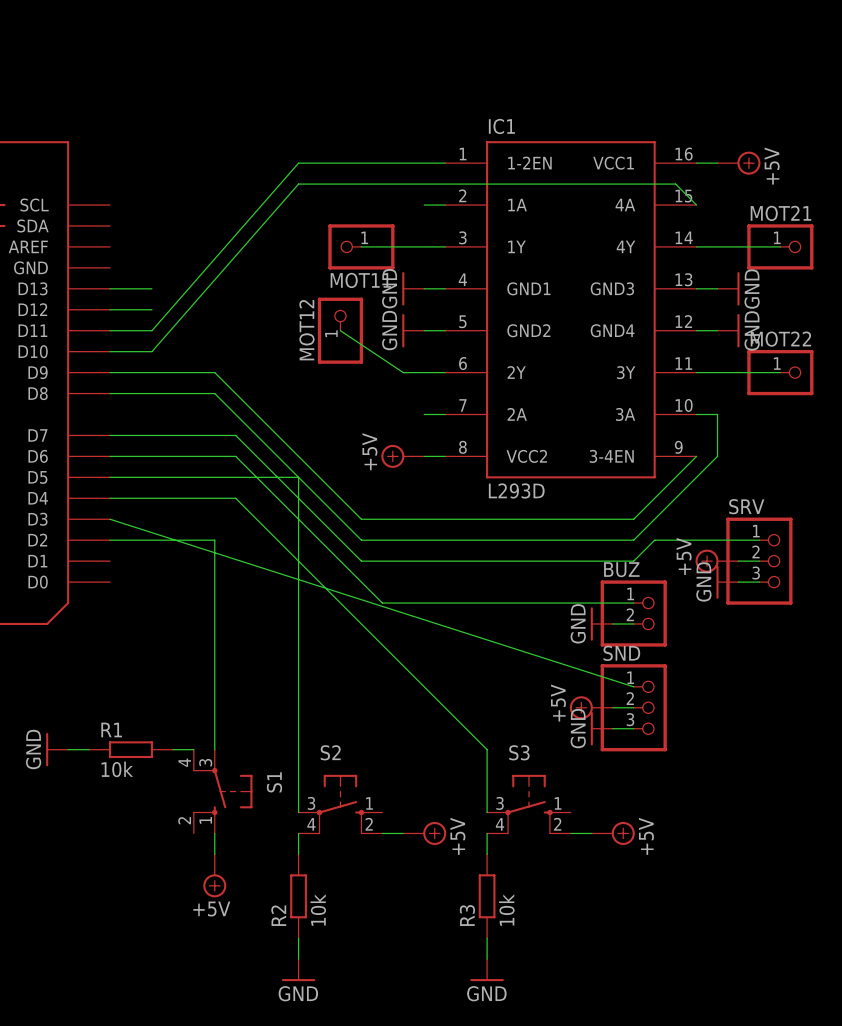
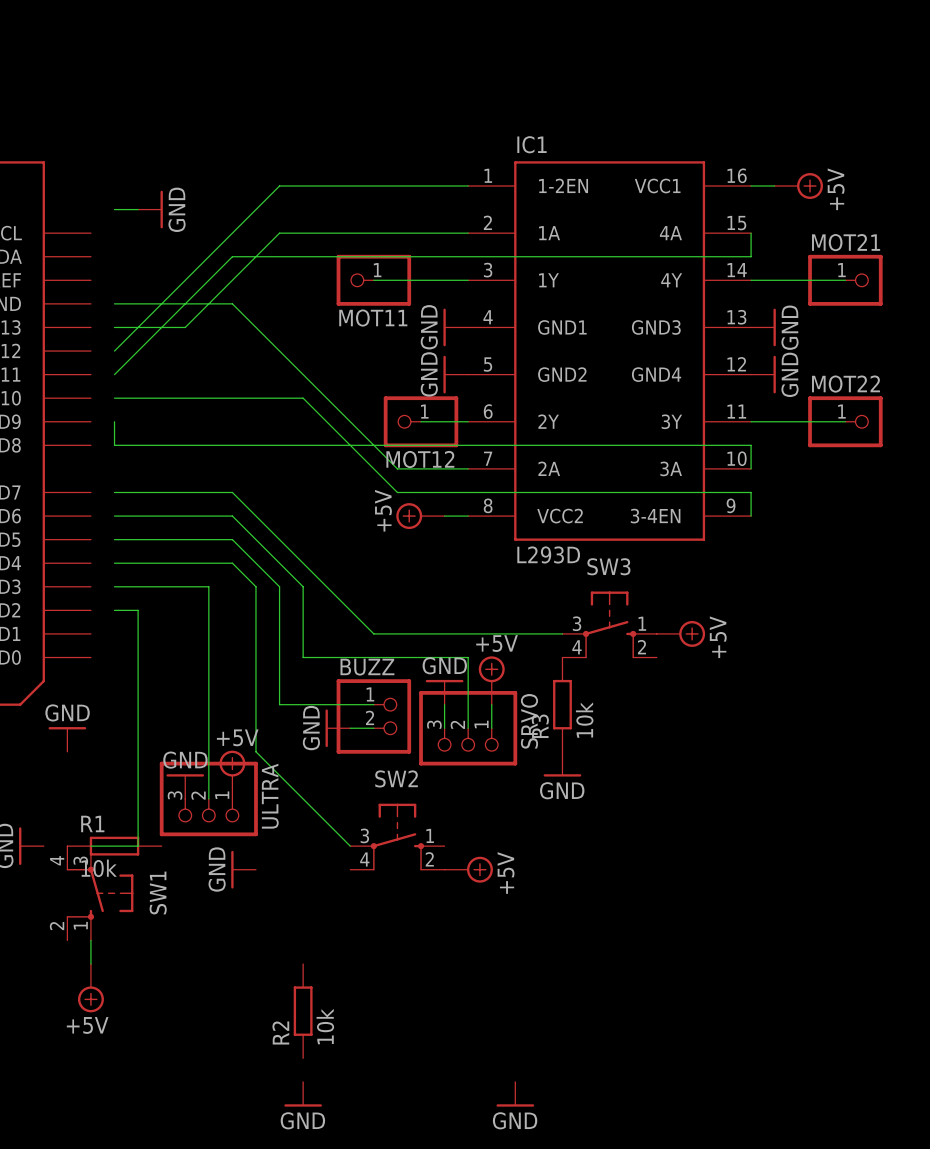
wire: (298, 163) (151, 330) (110, 330) -> (303, 186) (279, 186) (114, 351)
power symbol: none -> GND (150, 209)
wire: none -> (444, 233) (279, 233) (185, 327) (138, 327)
wire: (696, 205) (675, 184) (298, 184) (151, 351) -> (751, 233) (751, 256) (232, 256) (114, 374)
wire: none -> (114, 303) (232, 303) (397, 468) (444, 468)
wire: (110, 288) (130, 288) -> (114, 209) (138, 209)
power symbol position: GND (413, 288) -> GND (455, 327)
power symbol position: GND (728, 288) -> GND (763, 327)
wire: (110, 309) (151, 309) -> none
wire: (340, 330) (403, 372) -> none
MOT12 rotation: 0° (340, 330) -> 90° counterclockwise (421, 421)
MOT12 position: (340, 330) -> (421, 421)
power symbol position: GND (413, 330) -> GND (455, 374)
power symbol position: GND (728, 330) -> GND (763, 374)
wire: (110, 351) (130, 351) -> none
wire: (110, 372) (214, 372) (361, 519) (633, 519) (696, 456) -> (138, 398) (303, 398) (397, 492) (751, 492) (751, 516)
wire: (110, 393) (130, 393) -> (114, 421) (114, 445)
wire: (214, 393) (361, 540) (633, 540) (717, 456) (717, 414) (696, 414) -> (208, 445) (751, 445) (751, 468)
wire: (110, 435) (130, 435) -> none
wire: (110, 456) (130, 456) -> none
wire: (110, 477) (130, 477) -> none
wire: (235, 477) (298, 477) (298, 519) (382, 603) (633, 603) -> (232, 539) (279, 586) (279, 704) (373, 704)
wire: (110, 498) (130, 498) -> none
wire: (110, 519) (633, 686) -> none
wire: (256, 519) (487, 749) (487, 812) -> (255, 586) (255, 751) (350, 846)
wire: (110, 540) (130, 540) -> none
wire: (151, 540) (214, 540) -> (114, 586) (208, 586) (208, 610)
wire: none -> (138, 610) (138, 846) (90, 846)
wire: (759, 540) (654, 540) (633, 561) (528, 561) -> none
SW3: none -> (609, 624)
power symbol: none -> +5V (680, 633)
power symbol: +5V (716, 561) -> none
wire: (738, 561) (759, 561) -> none
SRV: (759, 561) -> none
wire: (298, 582) (298, 812) -> (303, 657) (468, 657) (468, 728)
power symbol: GND (727, 582) -> none
wire: (738, 582) (759, 582) -> none
power symbol: none -> +5V (491, 680)
power symbol: none -> GND (444, 692)
BUZ: (633, 613) -> none
wire: none -> (444, 704) (444, 728)
wire: none -> (491, 704) (491, 728)
power symbol: GND (601, 623) -> none
wire: (612, 623) (633, 623) -> none
BUZZ: none -> (373, 716)
power symbol: none -> GND (337, 728)
SRVO: none -> (468, 728)
power symbol: none -> GND (67, 739)
power symbol: none -> GND (562, 764)
power symbol: none -> +5V (232, 774)
power symbol: none -> GND (185, 786)
wire: (214, 707) (214, 749) -> none
ULTRA: none -> (208, 798)
power symbol: +5V (591, 707) -> none
wire: (612, 707) (633, 707) -> none
SND: (633, 707) -> none
power symbol: GND (601, 728) -> none
wire: (612, 728) (633, 728) -> none
SW2: none -> (397, 837)
wire: (68, 749) (89, 749) -> none
wire: (172, 749) (193, 749) -> none
power symbol: none -> GND (243, 869)
SW1: none -> (100, 893)
S1: (222, 791) -> none
S2: (340, 804) -> none
S3: (528, 804) -> none
wire: (214, 833) (214, 854) -> (90, 940) (90, 964)
wire: (298, 833) (298, 854) -> none
wire: (382, 833) (403, 833) -> (350, 728) (373, 728)
power symbol position: +5V (424, 833) -> +5V (468, 869)
wire: (487, 833) (487, 854) -> none
wire: (570, 833) (591, 833) -> none
power symbol: +5V (613, 833) -> none
power symbol: none -> +5V (90, 988)
power symbol: +5V (214, 875) -> none
R3 position: (487, 896) -> (562, 704)
wire: (298, 938) (298, 959) -> none
wire: (487, 938) (487, 959) -> none

